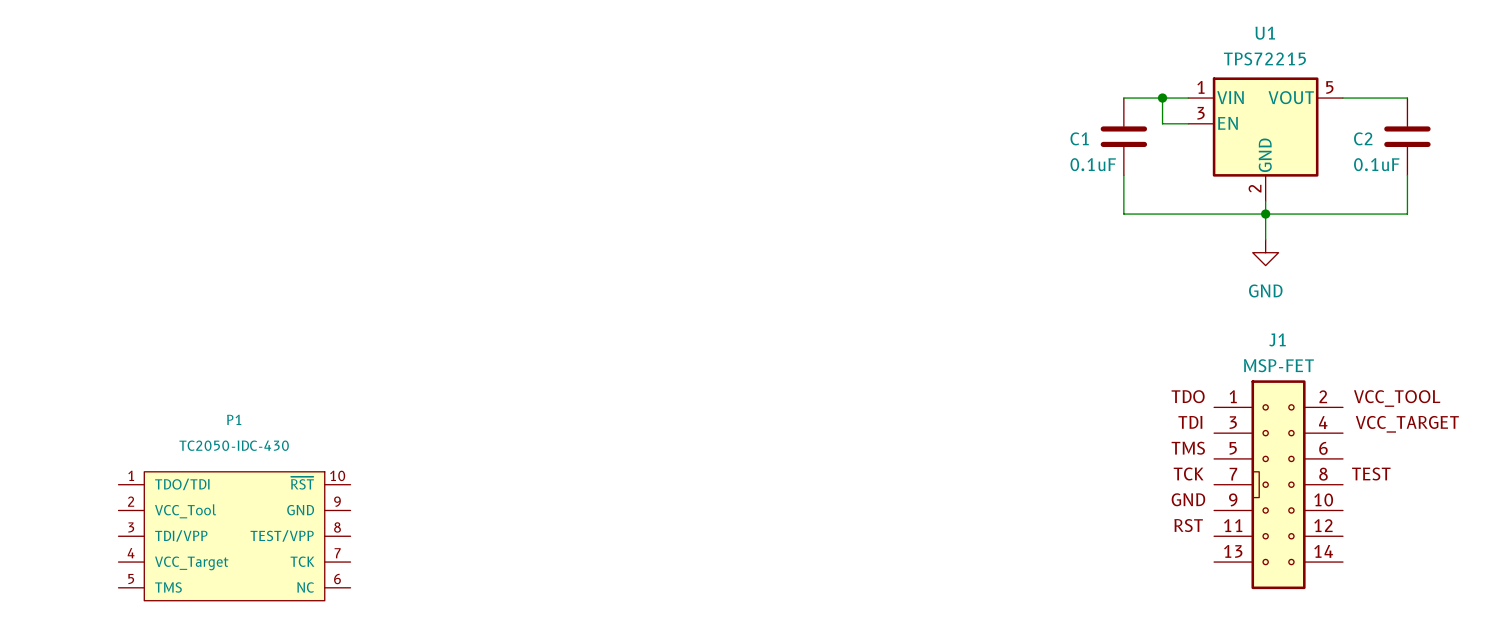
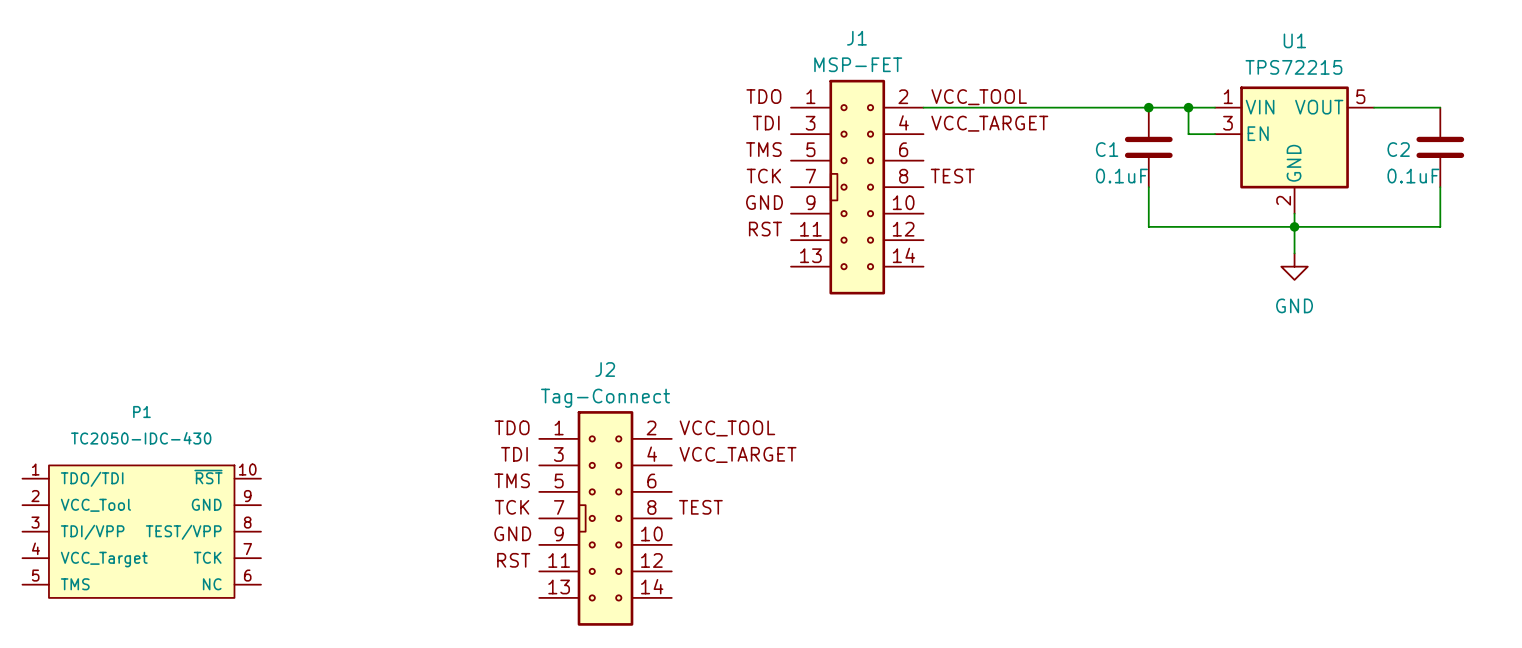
wire: none -> (923, 107) (1148, 107)
junction: none -> (1148, 107)
J1 position: (1278, 484) -> (857, 187)
J2: none -> Tag-Connect (605, 518)
P1 position: (234, 536) -> (141, 531)

